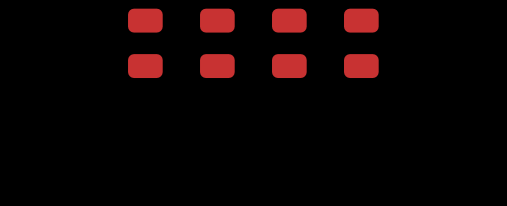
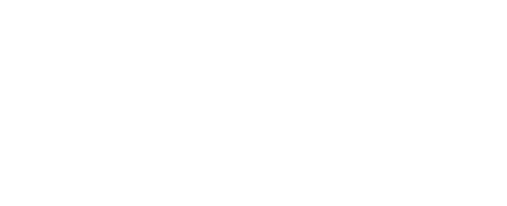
part: (145, 43) -> none
part: (217, 43) -> none
part: (289, 43) -> none
part: (361, 43) -> none

